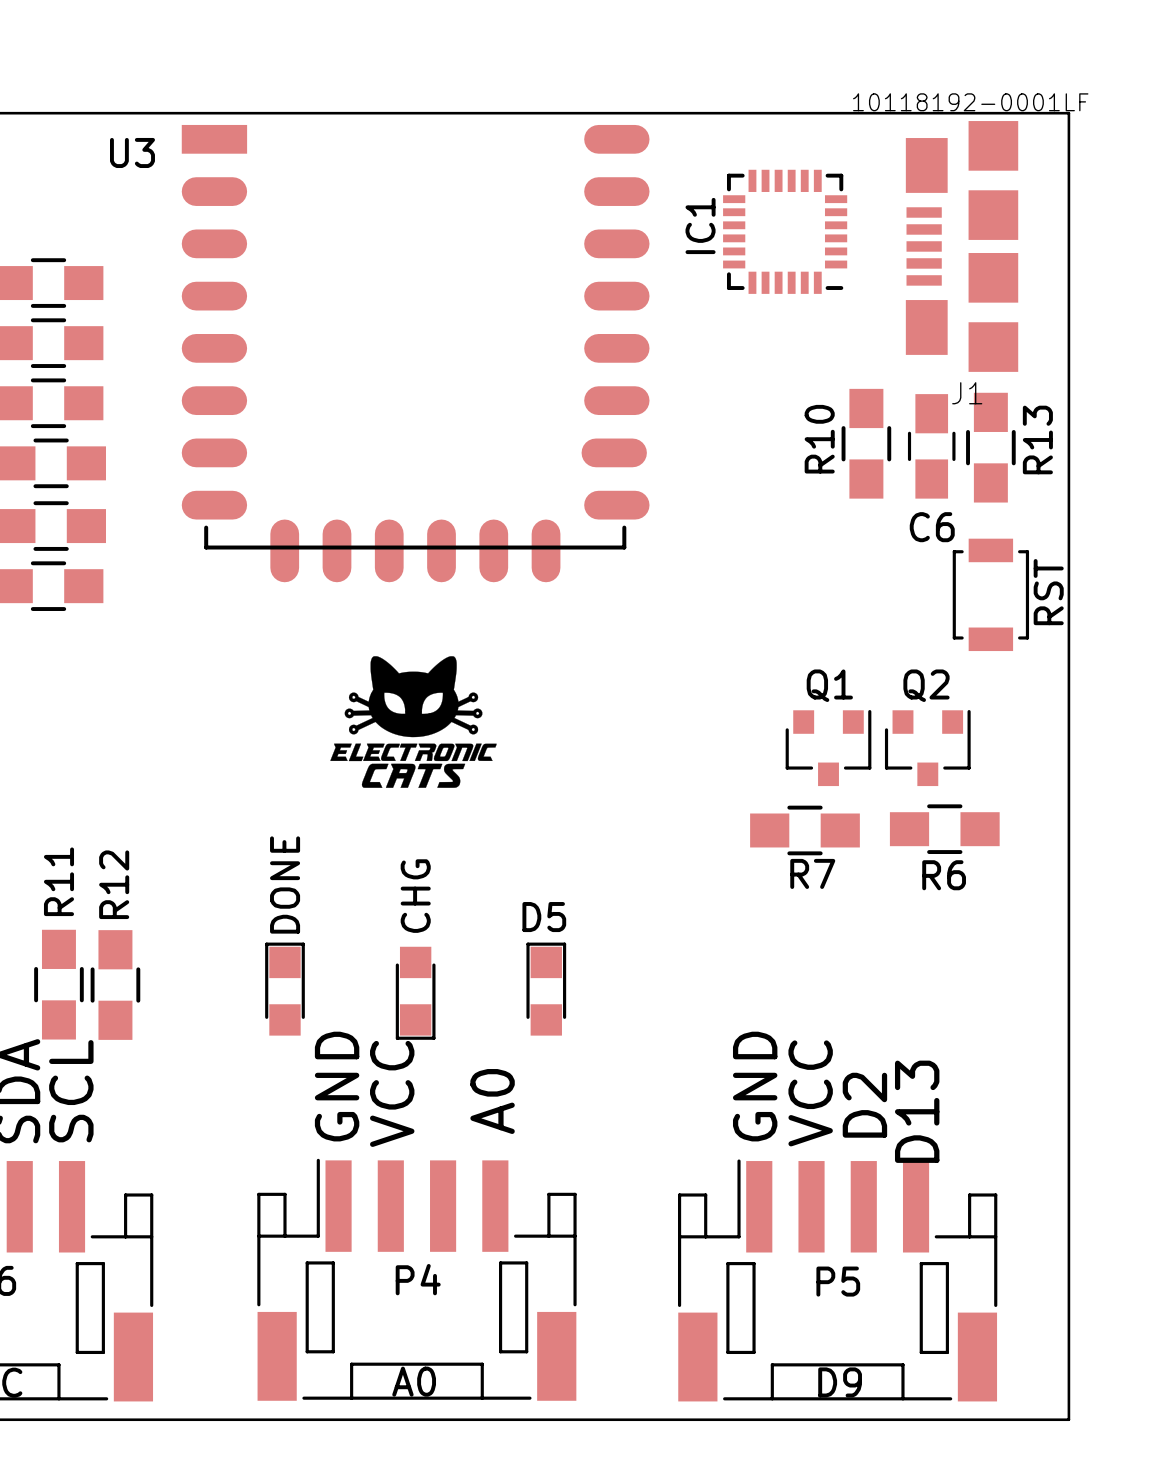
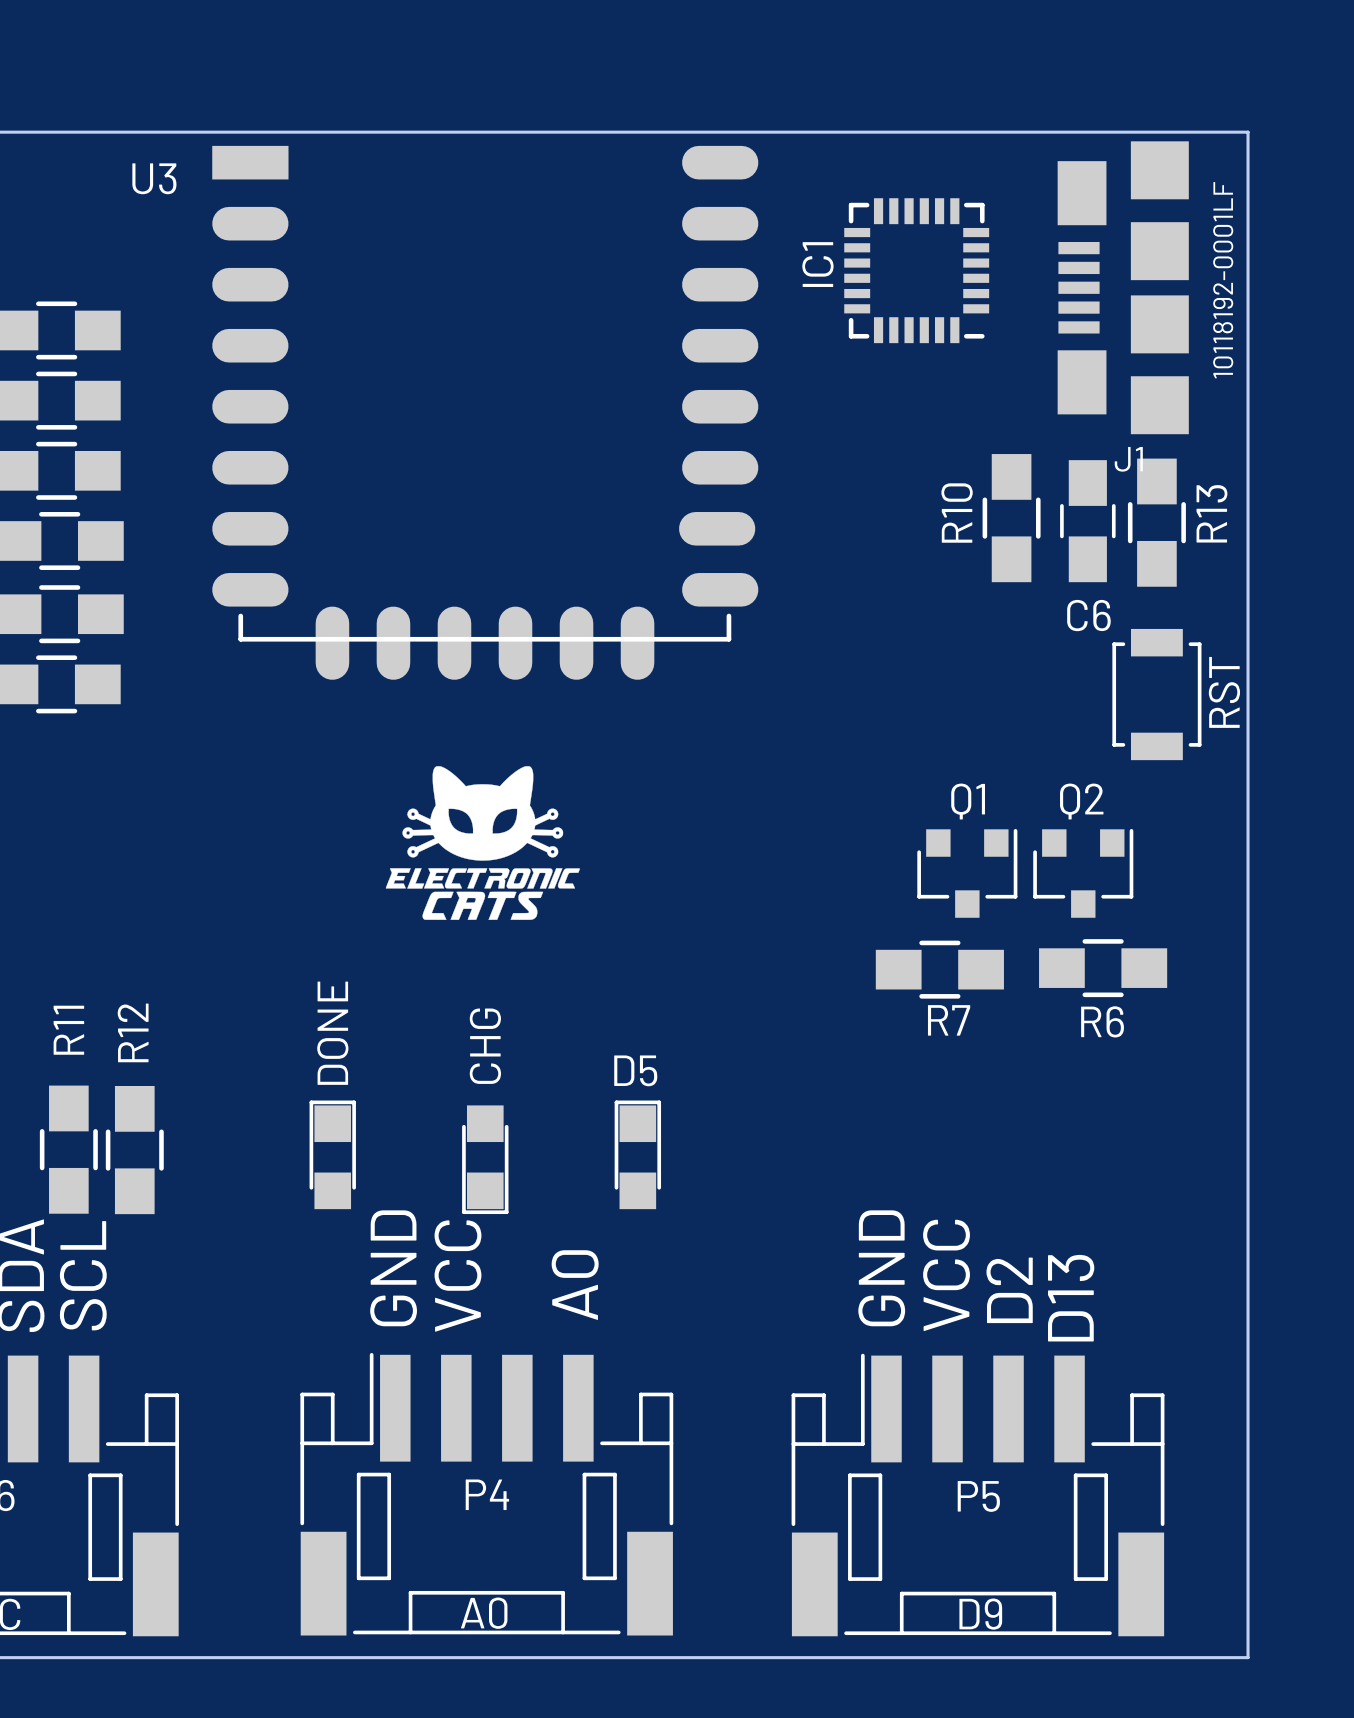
J1 value rotation: 0° (970, 102) -> 90° counterclockwise (1223, 280)

